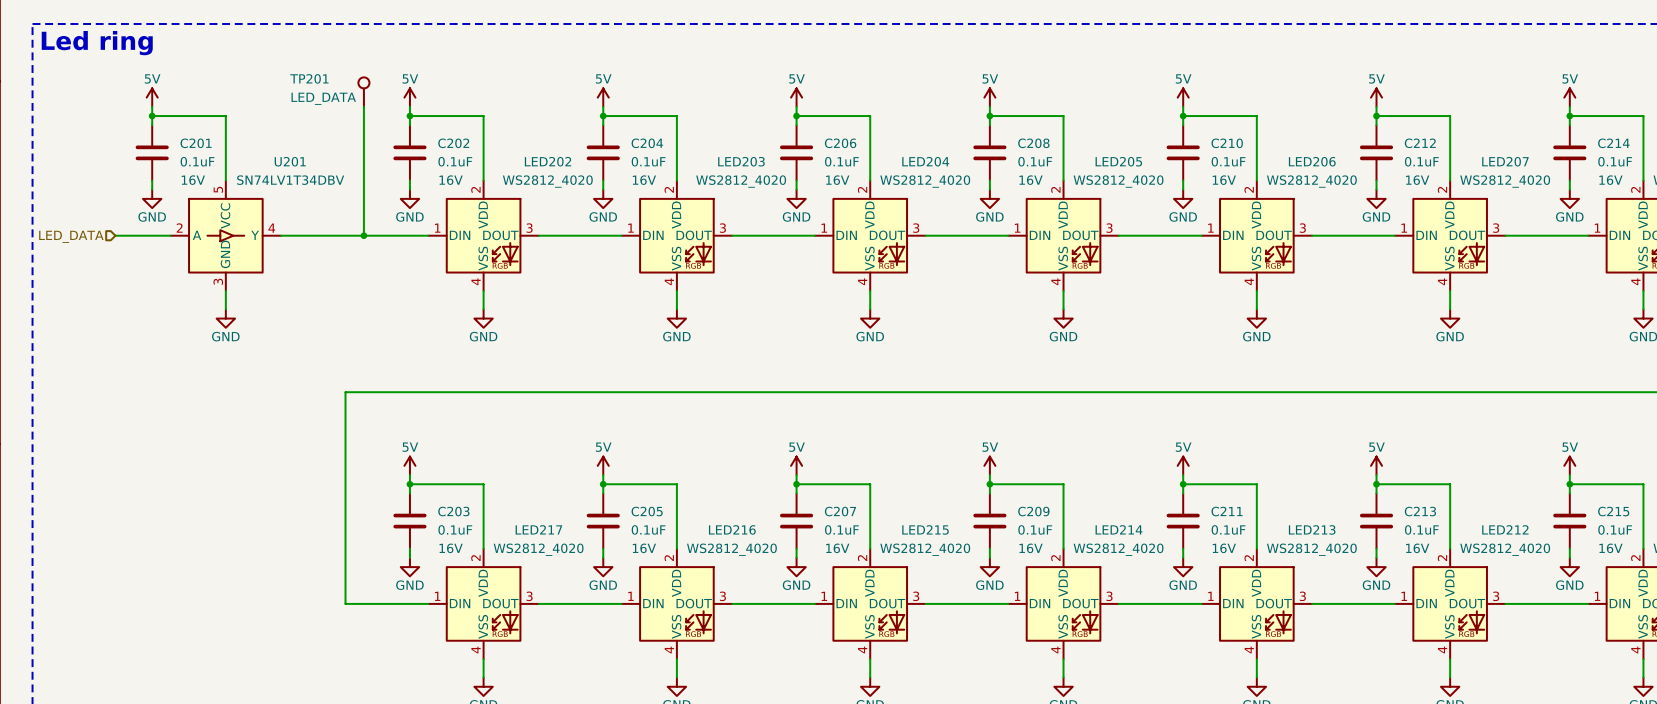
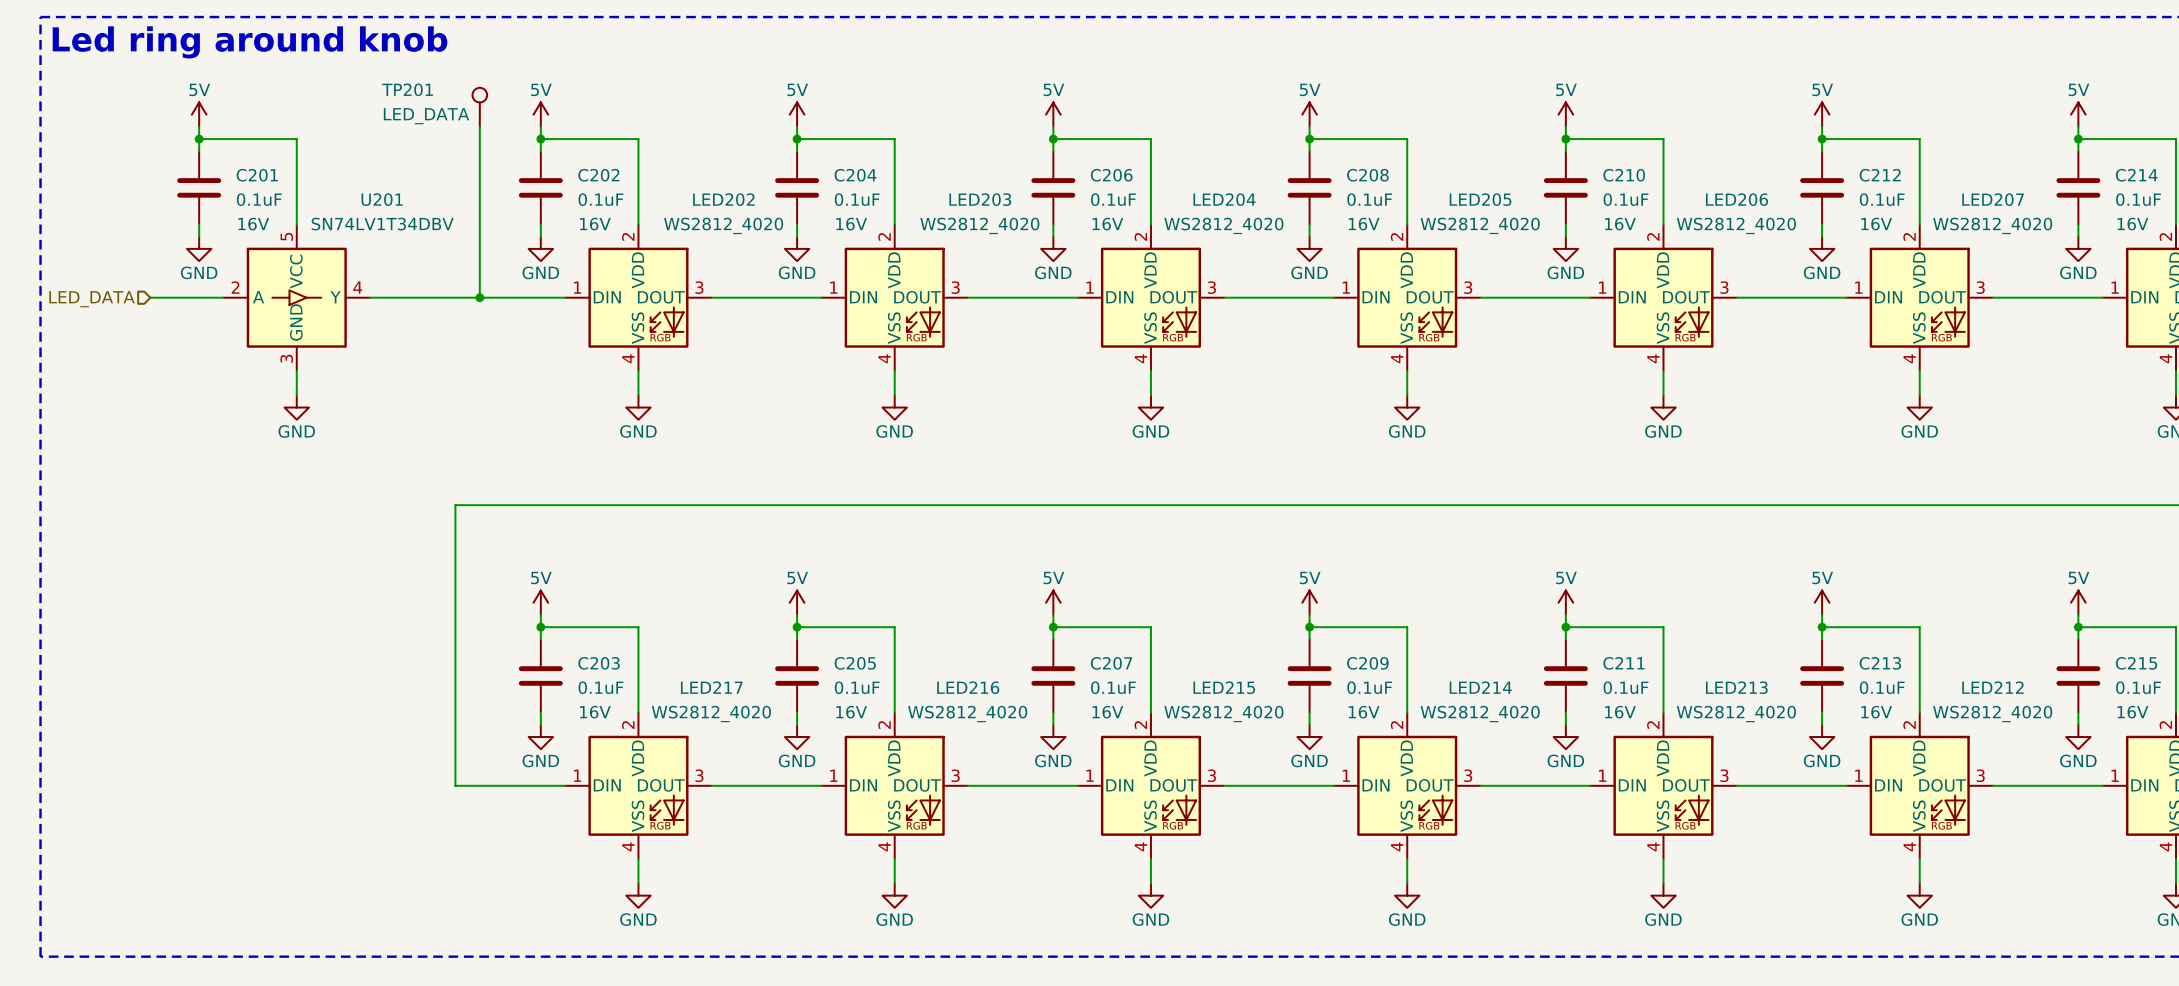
text: Led ring (97, 43) -> Led ring around knob (250, 42)

